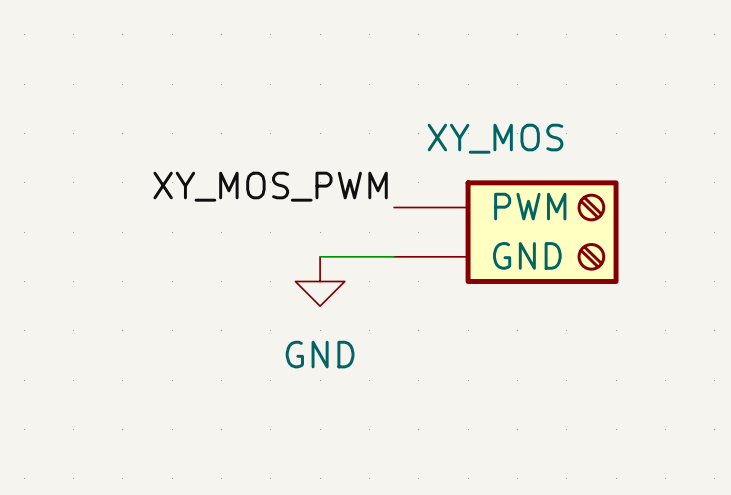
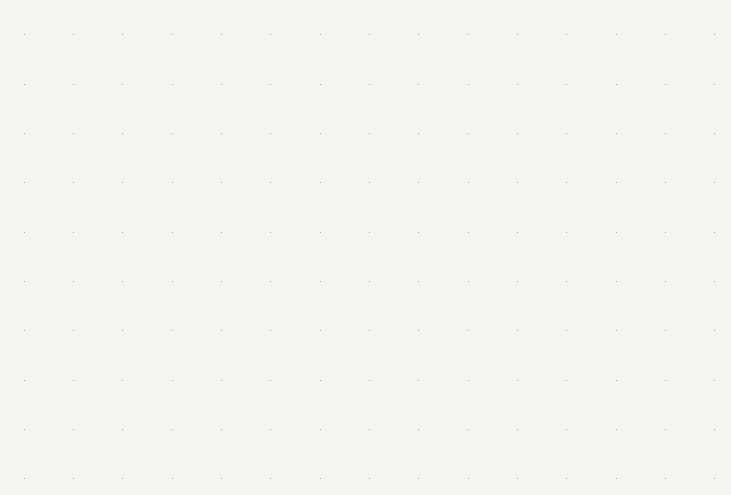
label: XY_MOS_PWM (270, 186) -> none
part: XY_MOS (506, 232) -> none
wire: (320, 256) (394, 256) -> none
power symbol: GND (320, 281) -> none

